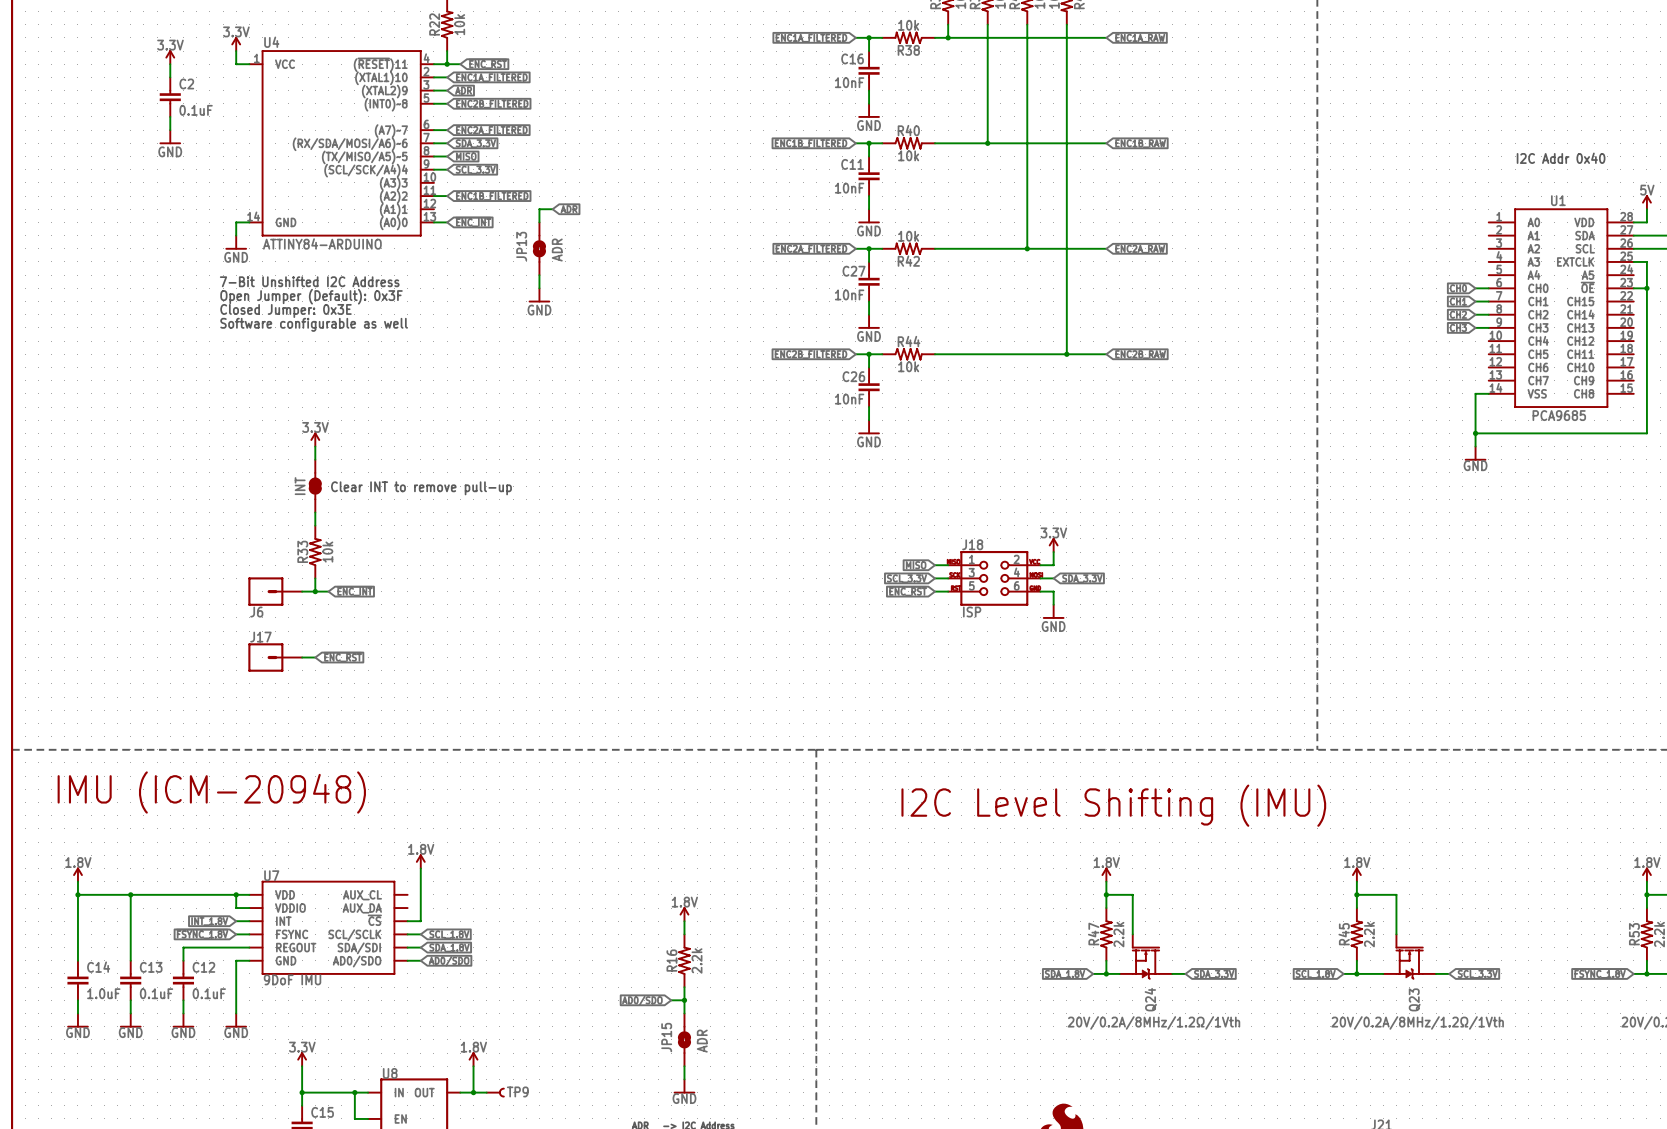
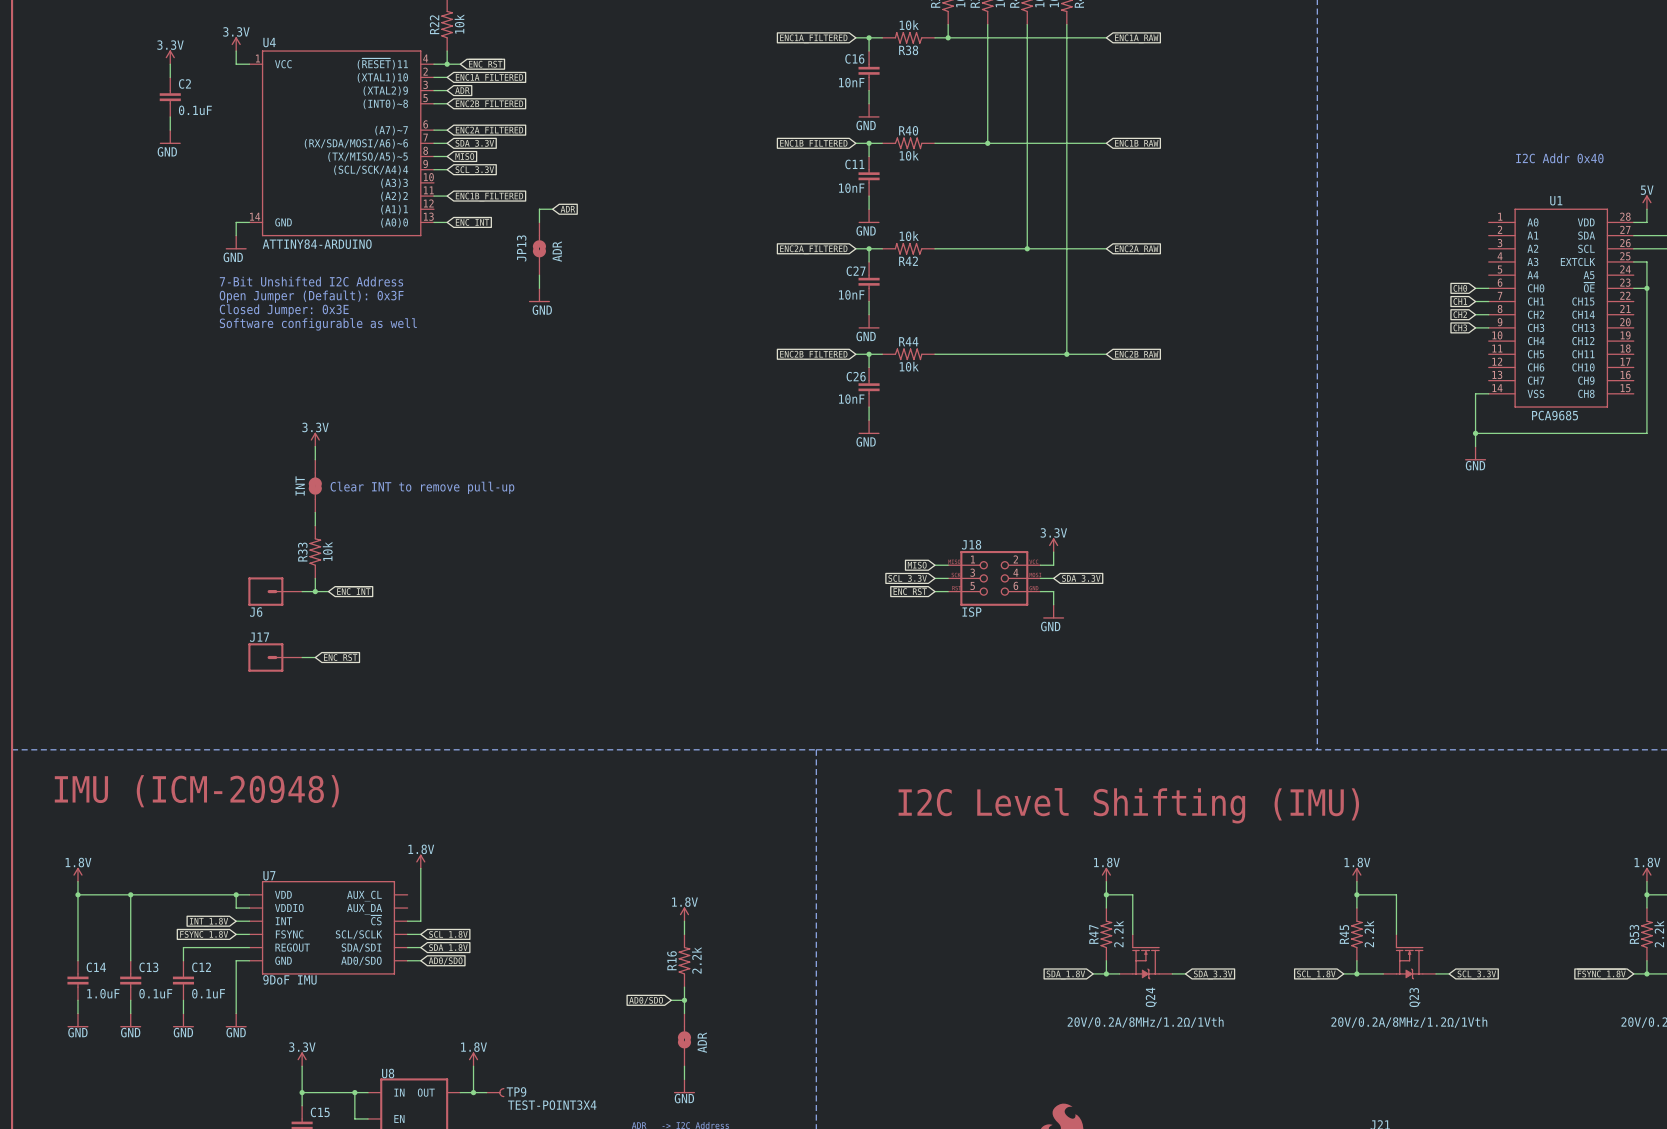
JP15 name: JP15 (666, 1037) -> none
TP9 value: none -> TEST-POINT3X4 (552, 1105)

